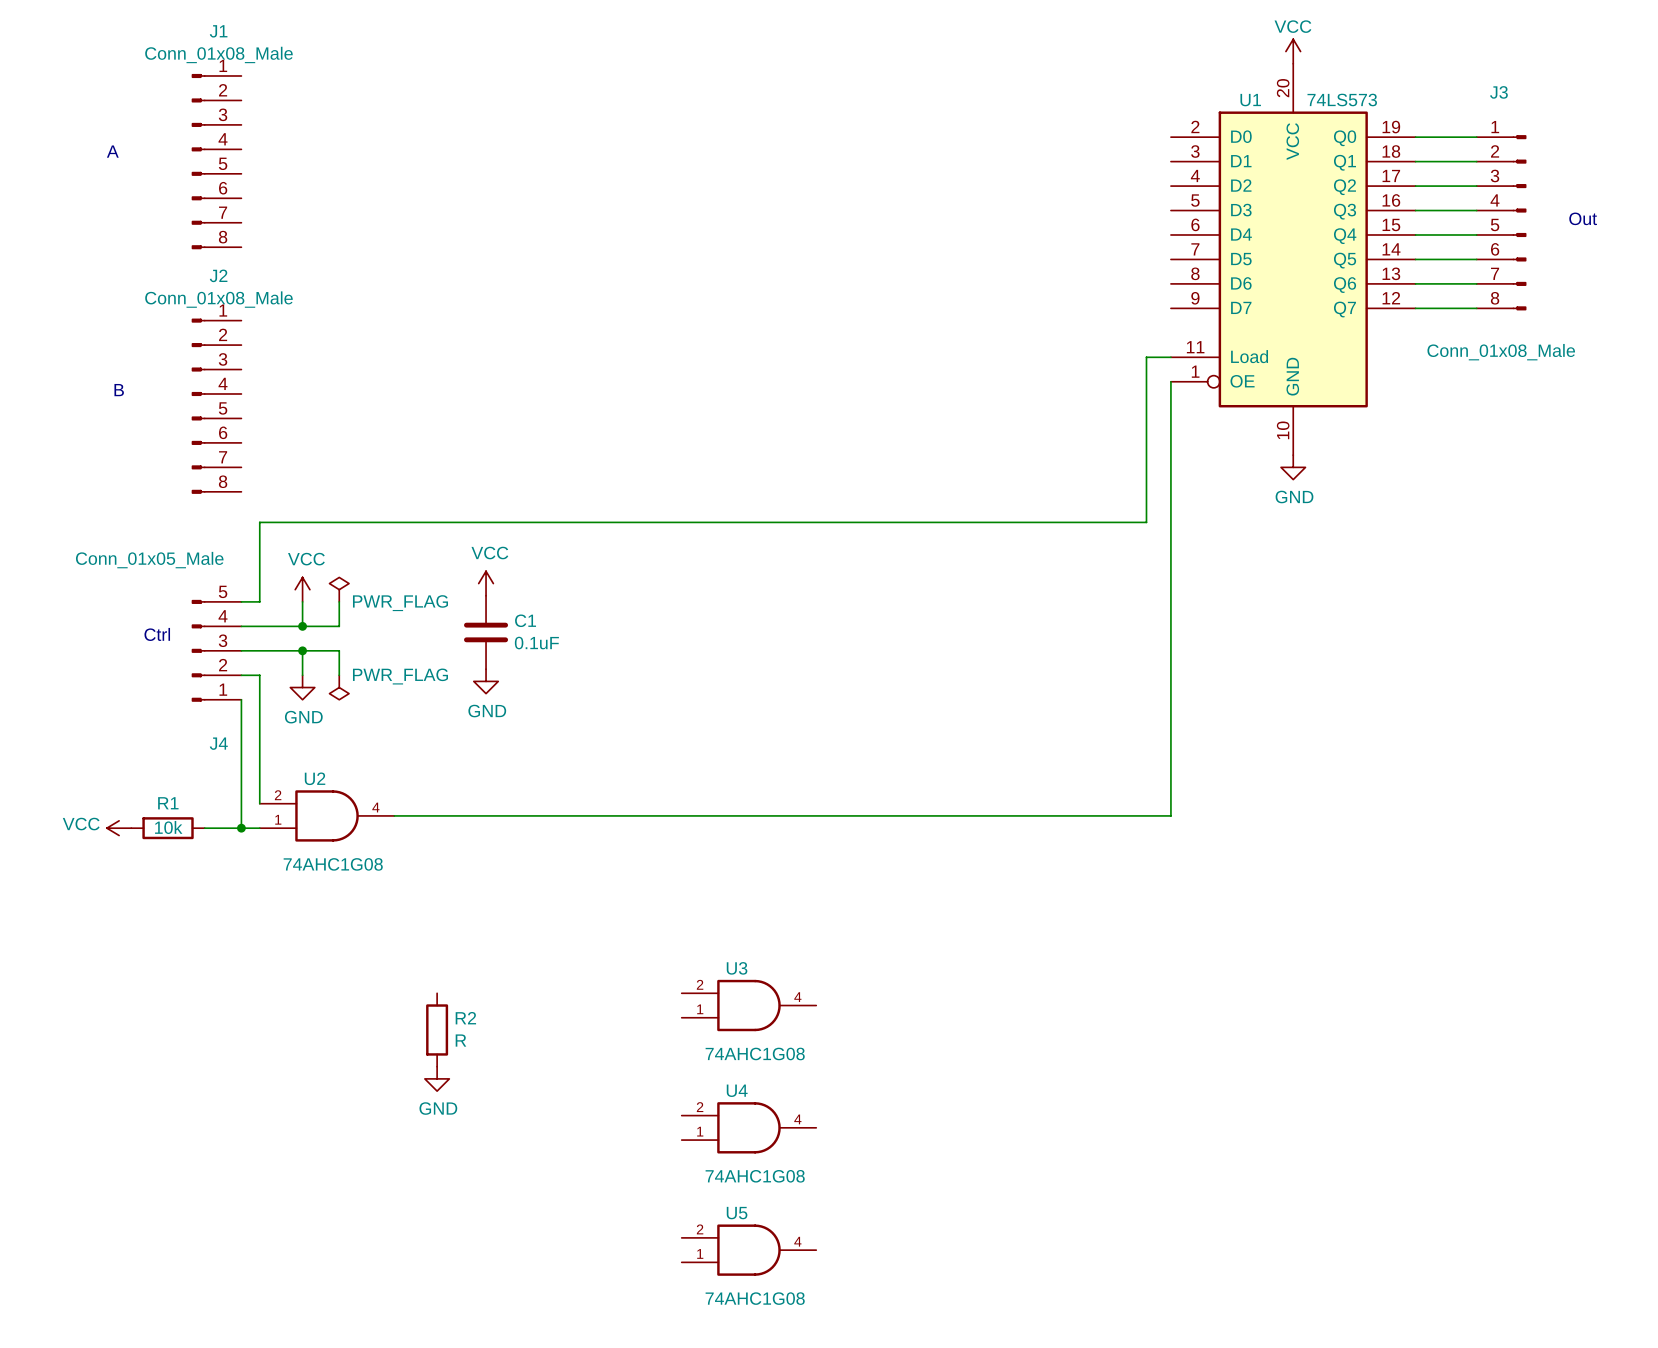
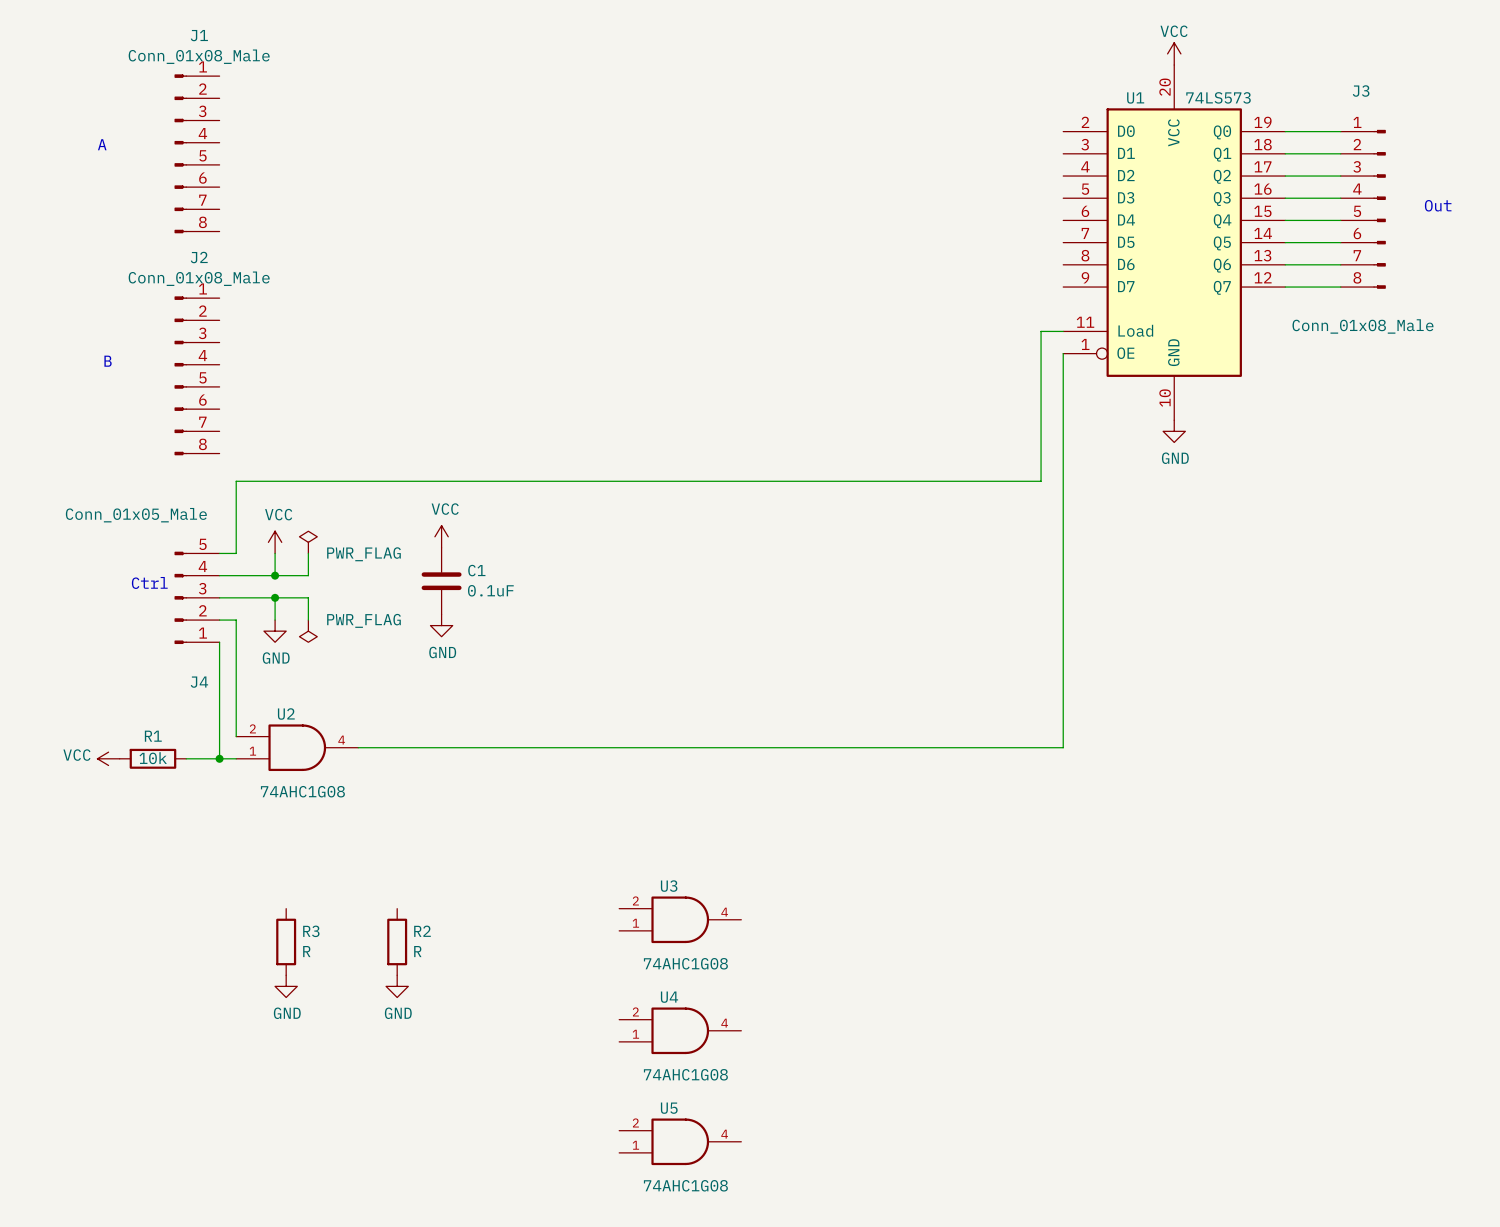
R3: none -> R (286, 941)
power symbol: none -> GND (286, 986)

